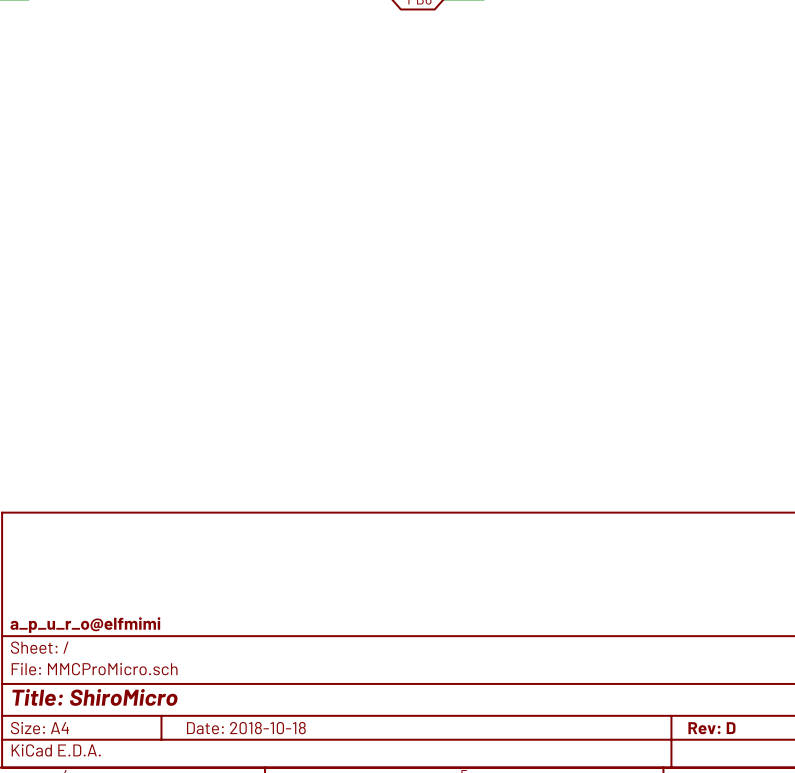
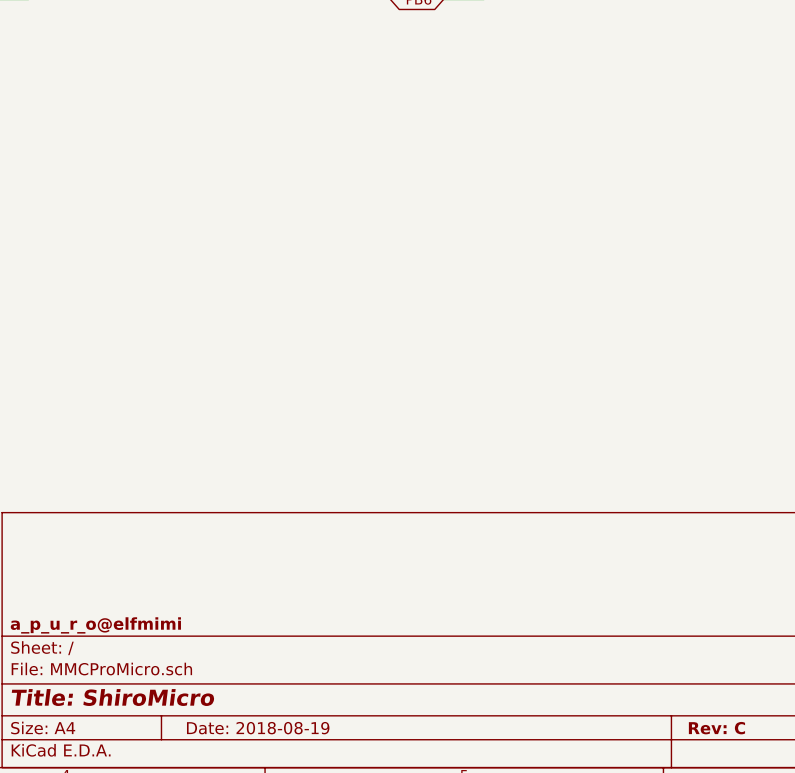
title block: Date: 2018-10-18 (246, 728) -> Date: 2018-08-19 (258, 728)
title block: Rev: D (711, 728) -> Rev: C (716, 728)

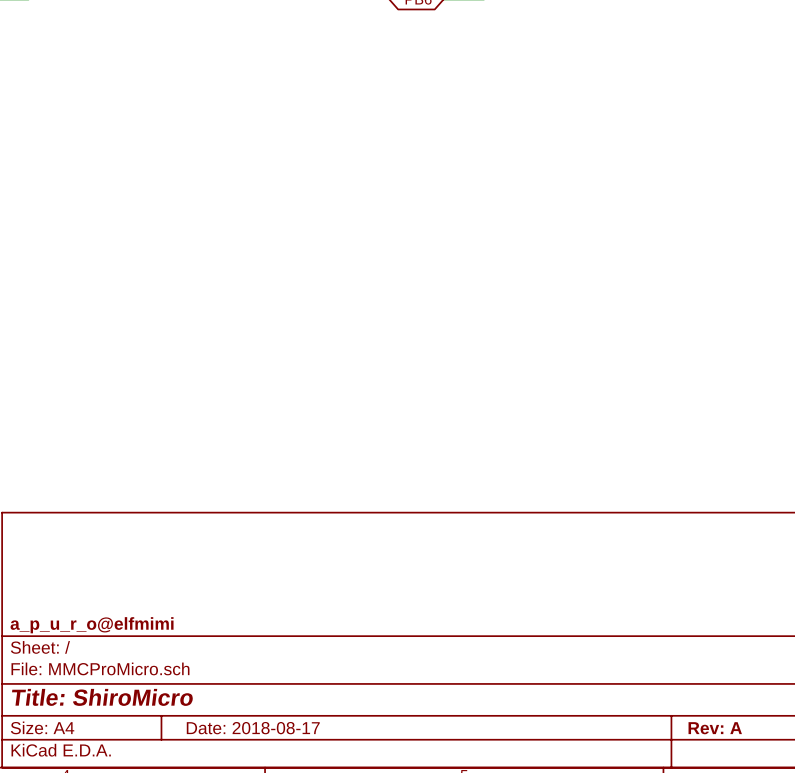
title block: Date: 2018-08-19 (258, 728) -> Date: 2018-08-17 (253, 728)
title block: Rev: C (716, 728) -> Rev: A (715, 728)

